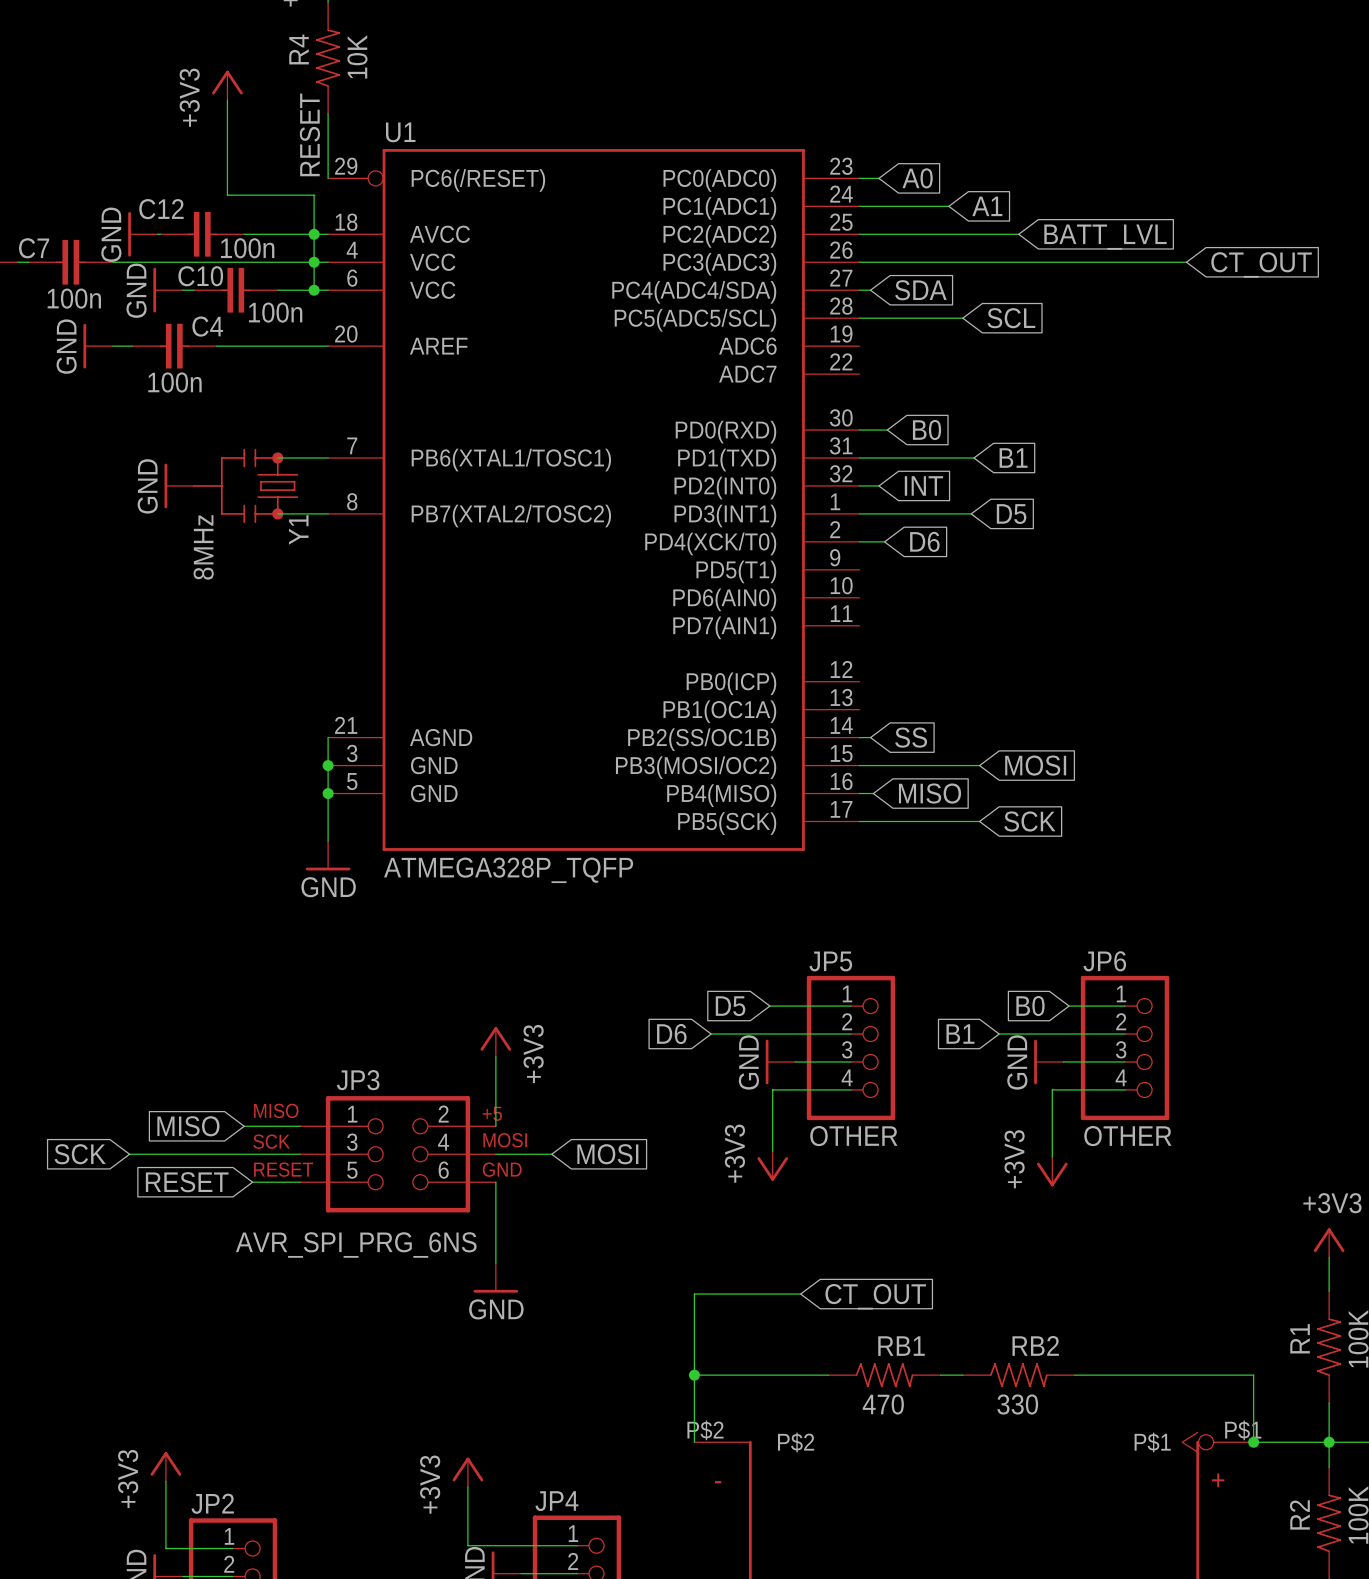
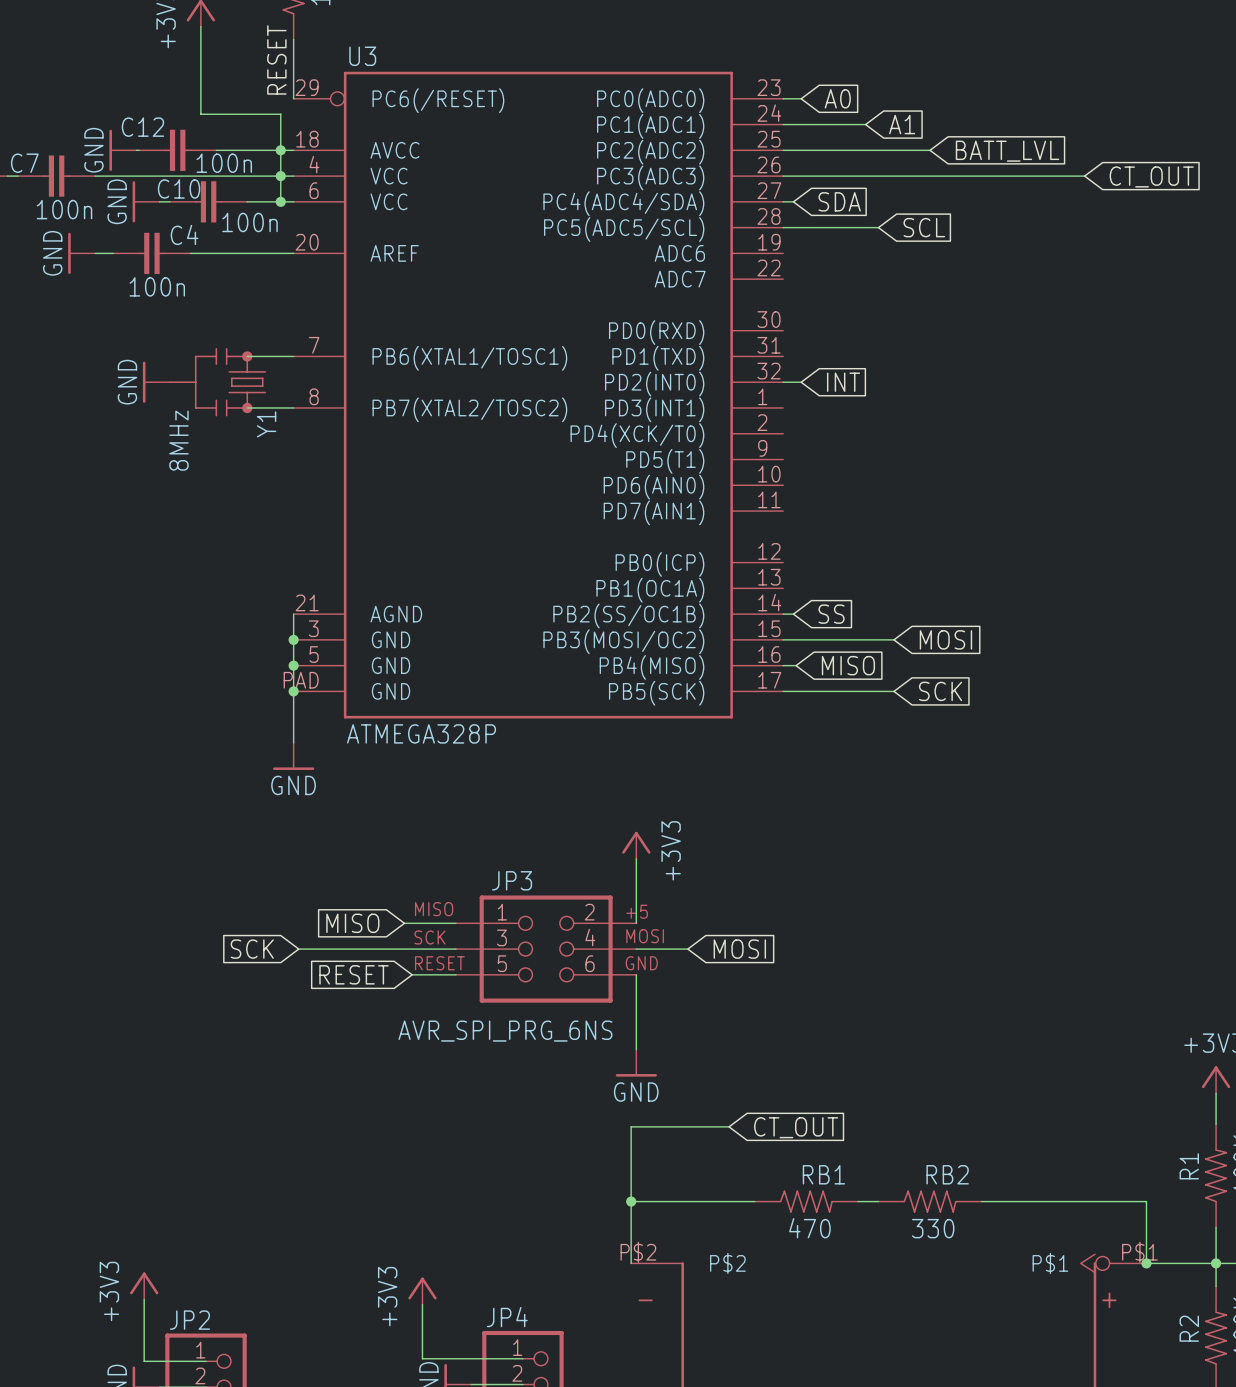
wire: (859, 430) (887, 430) -> none
global label: B0 (927, 430) -> none
wire: (859, 457) (974, 457) -> none
global label: B1 (1013, 457) -> none
U1: ATMEGA328P_TQFP (593, 499) -> none
U3: none -> ATMEGA328P (538, 395)
wire: (859, 513) (971, 513) -> none
global label: D5 (1011, 514) -> none
wire: (859, 541) (884, 541) -> none
global label: D6 (924, 541) -> none
junction: none -> (293, 691)
power symbol position: GND (328, 855) -> GND (293, 756)
power symbol: none -> +3V3 (636, 845)
global label: D5 (730, 1006) -> none
wire: (769, 1006) (850, 1006) -> none
global label: B0 (1030, 1006) -> none
wire: (1069, 1006) (1125, 1006) -> none
global label: D6 (671, 1034) -> none
wire: (711, 1034) (850, 1034) -> none
global label: B1 (960, 1034) -> none
wire: (999, 1034) (1125, 1034) -> none
power symbol: +3V3 (495, 1041) -> none
JP5: OTHER (850, 1047) -> none
JP6: OTHER (1125, 1047) -> none
wire: (495, 1056) (495, 1126) -> (636, 858) (636, 923)
power symbol: GND (780, 1061) -> none
wire: (795, 1061) (850, 1061) -> none
power symbol: GND (1048, 1061) -> none
wire: (1063, 1061) (1125, 1061) -> none
wire: (850, 1089) (772, 1089) (772, 1151) -> none
wire: (1125, 1089) (1052, 1089) (1052, 1157) -> none
global label position: MISO (188, 1126) -> MISO (352, 923)
wire: (244, 1126) (300, 1126) -> (404, 923) (455, 923)
global label position: SCK (80, 1154) -> SCK (252, 949)
wire: (129, 1154) (300, 1154) -> (298, 949) (455, 949)
JP3 position: (398, 1154) -> (546, 949)
wire: (495, 1154) (551, 1154) -> (636, 949) (687, 949)
global label position: MOSI (607, 1154) -> MOSI (739, 949)
power symbol: +3V3 (772, 1166) -> none
power symbol: +3V3 (1052, 1171) -> none
global label position: RESET (187, 1182) -> RESET (354, 974)
wire: (252, 1182) (300, 1182) -> (412, 974) (455, 974)
wire: (495, 1182) (495, 1263) -> (636, 974) (636, 1049)
power symbol: none -> GND (636, 1063)
power symbol: GND (495, 1277) -> none

